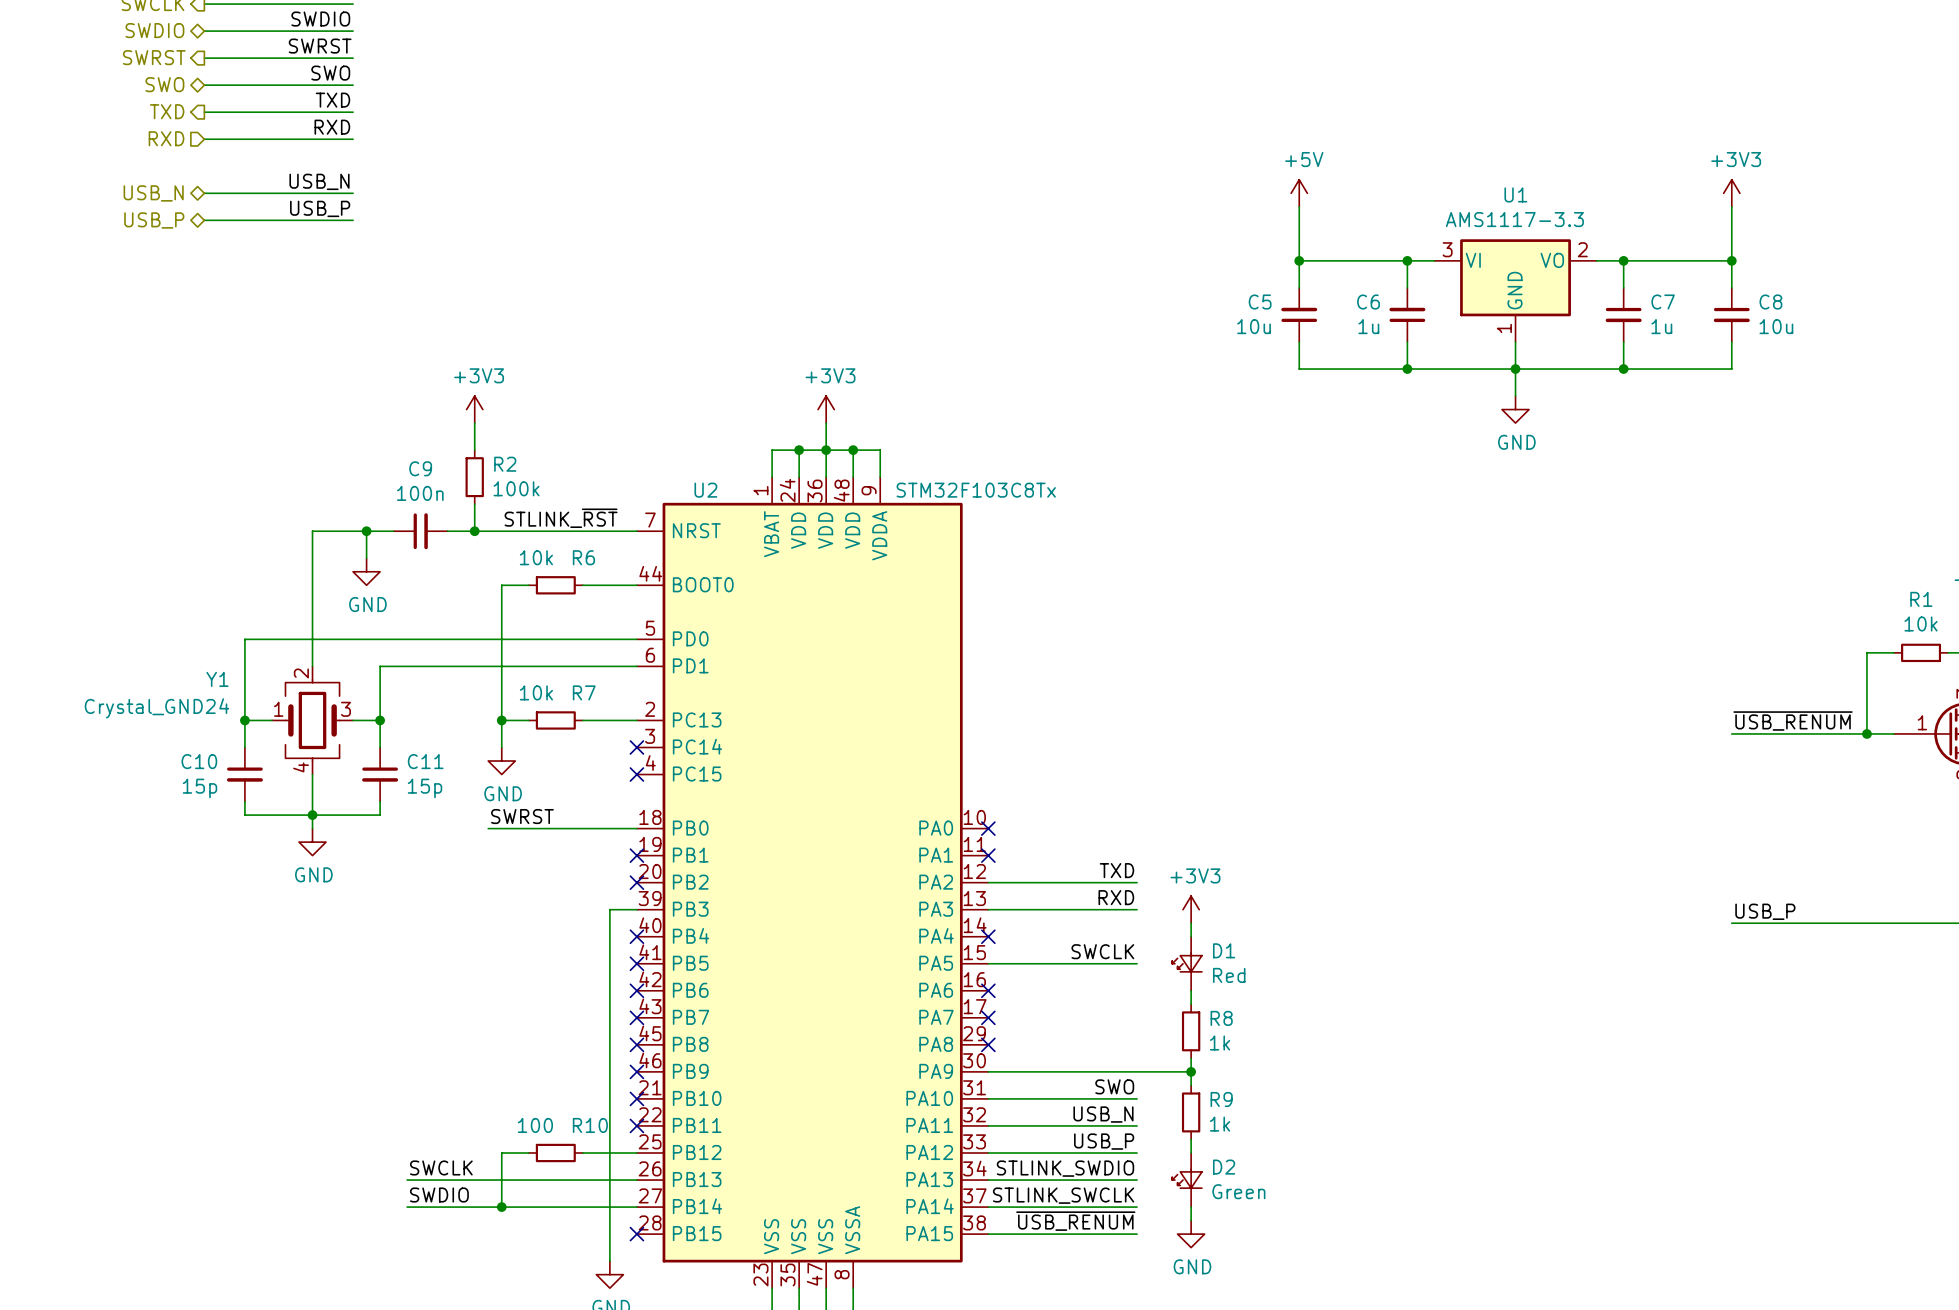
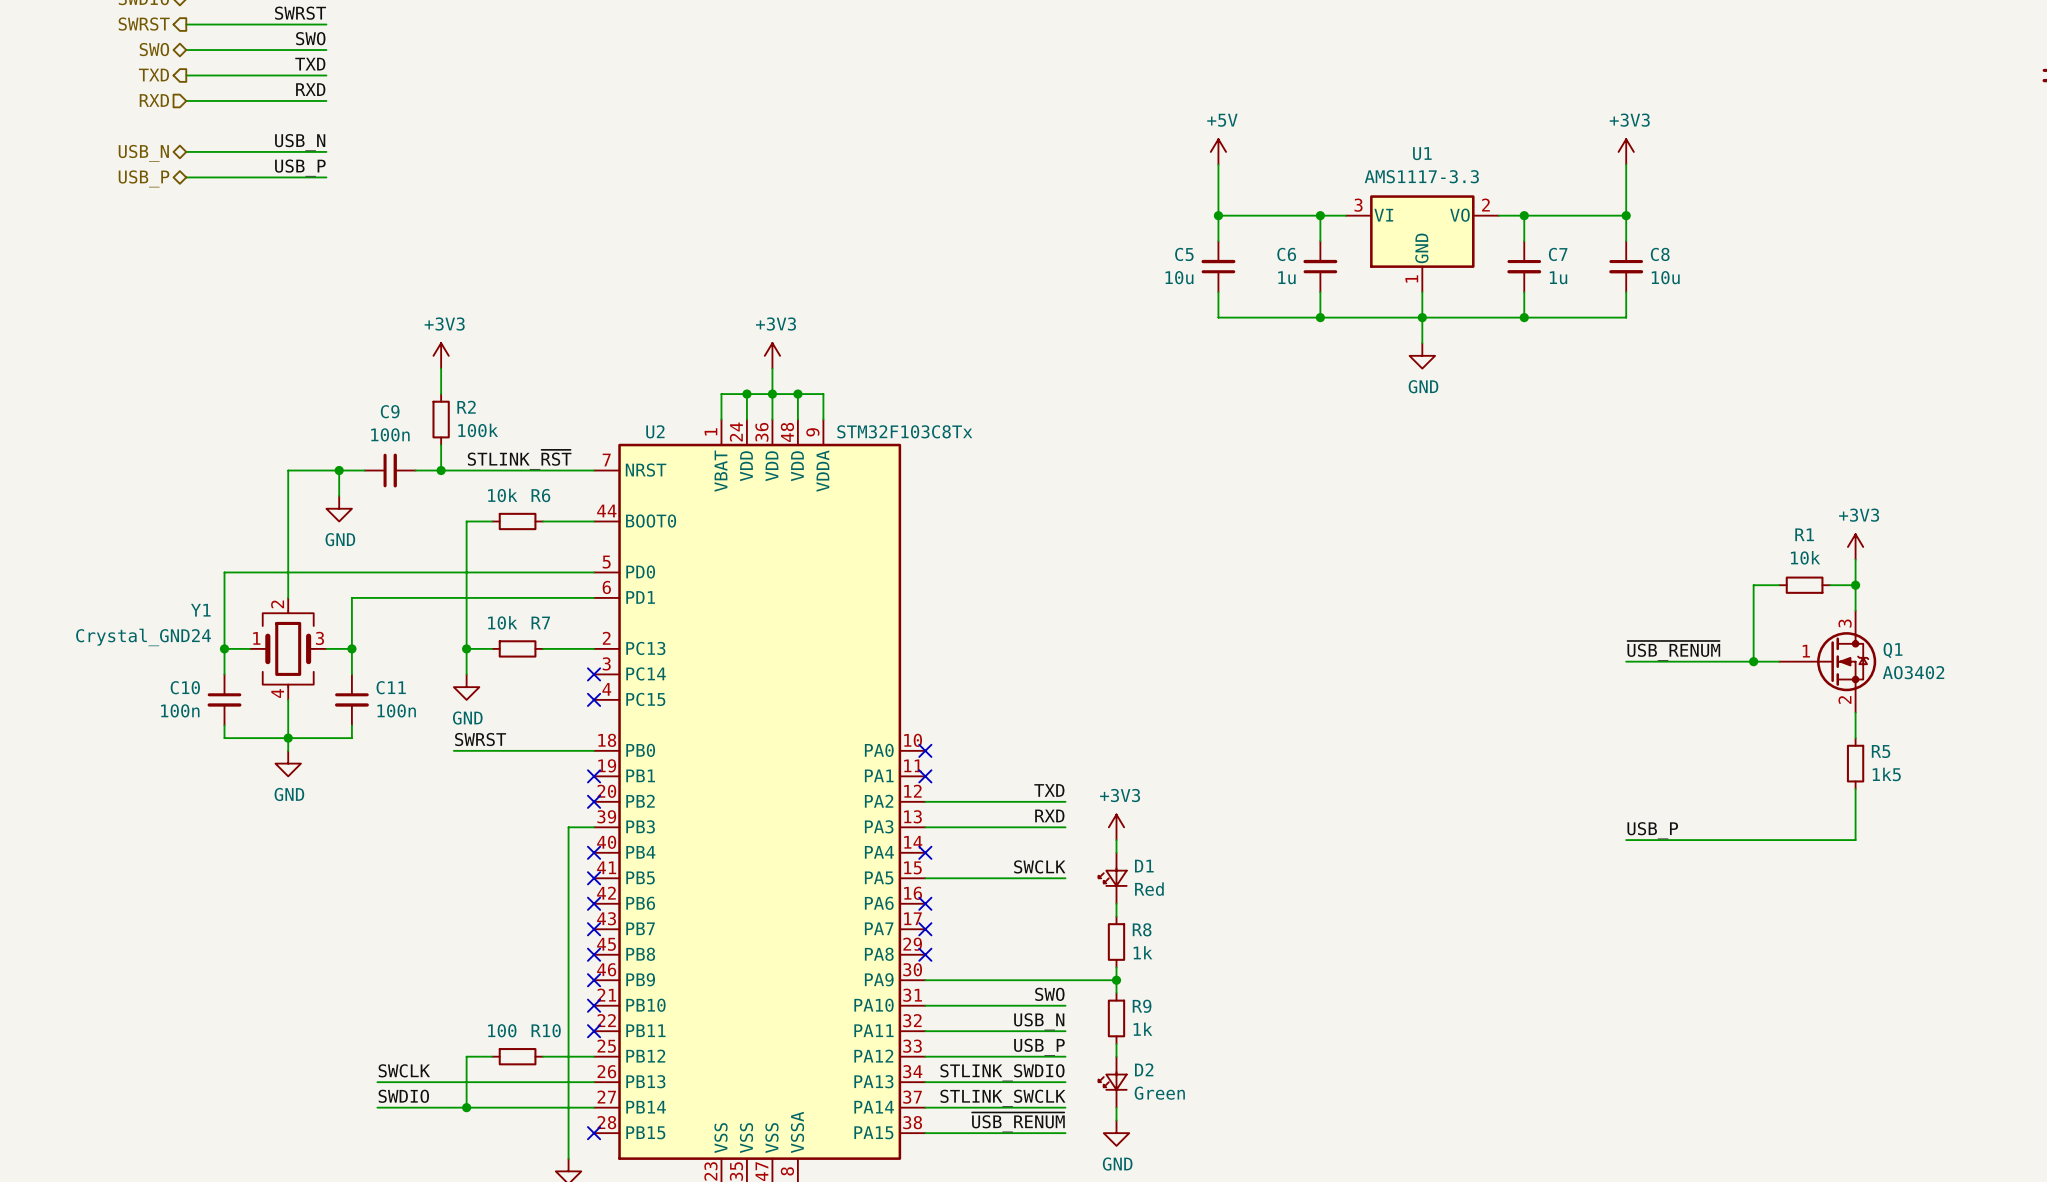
C10 value: 15p (200, 788) -> 100n (180, 710)
C11 value: 15p (425, 788) -> 100n (396, 710)

